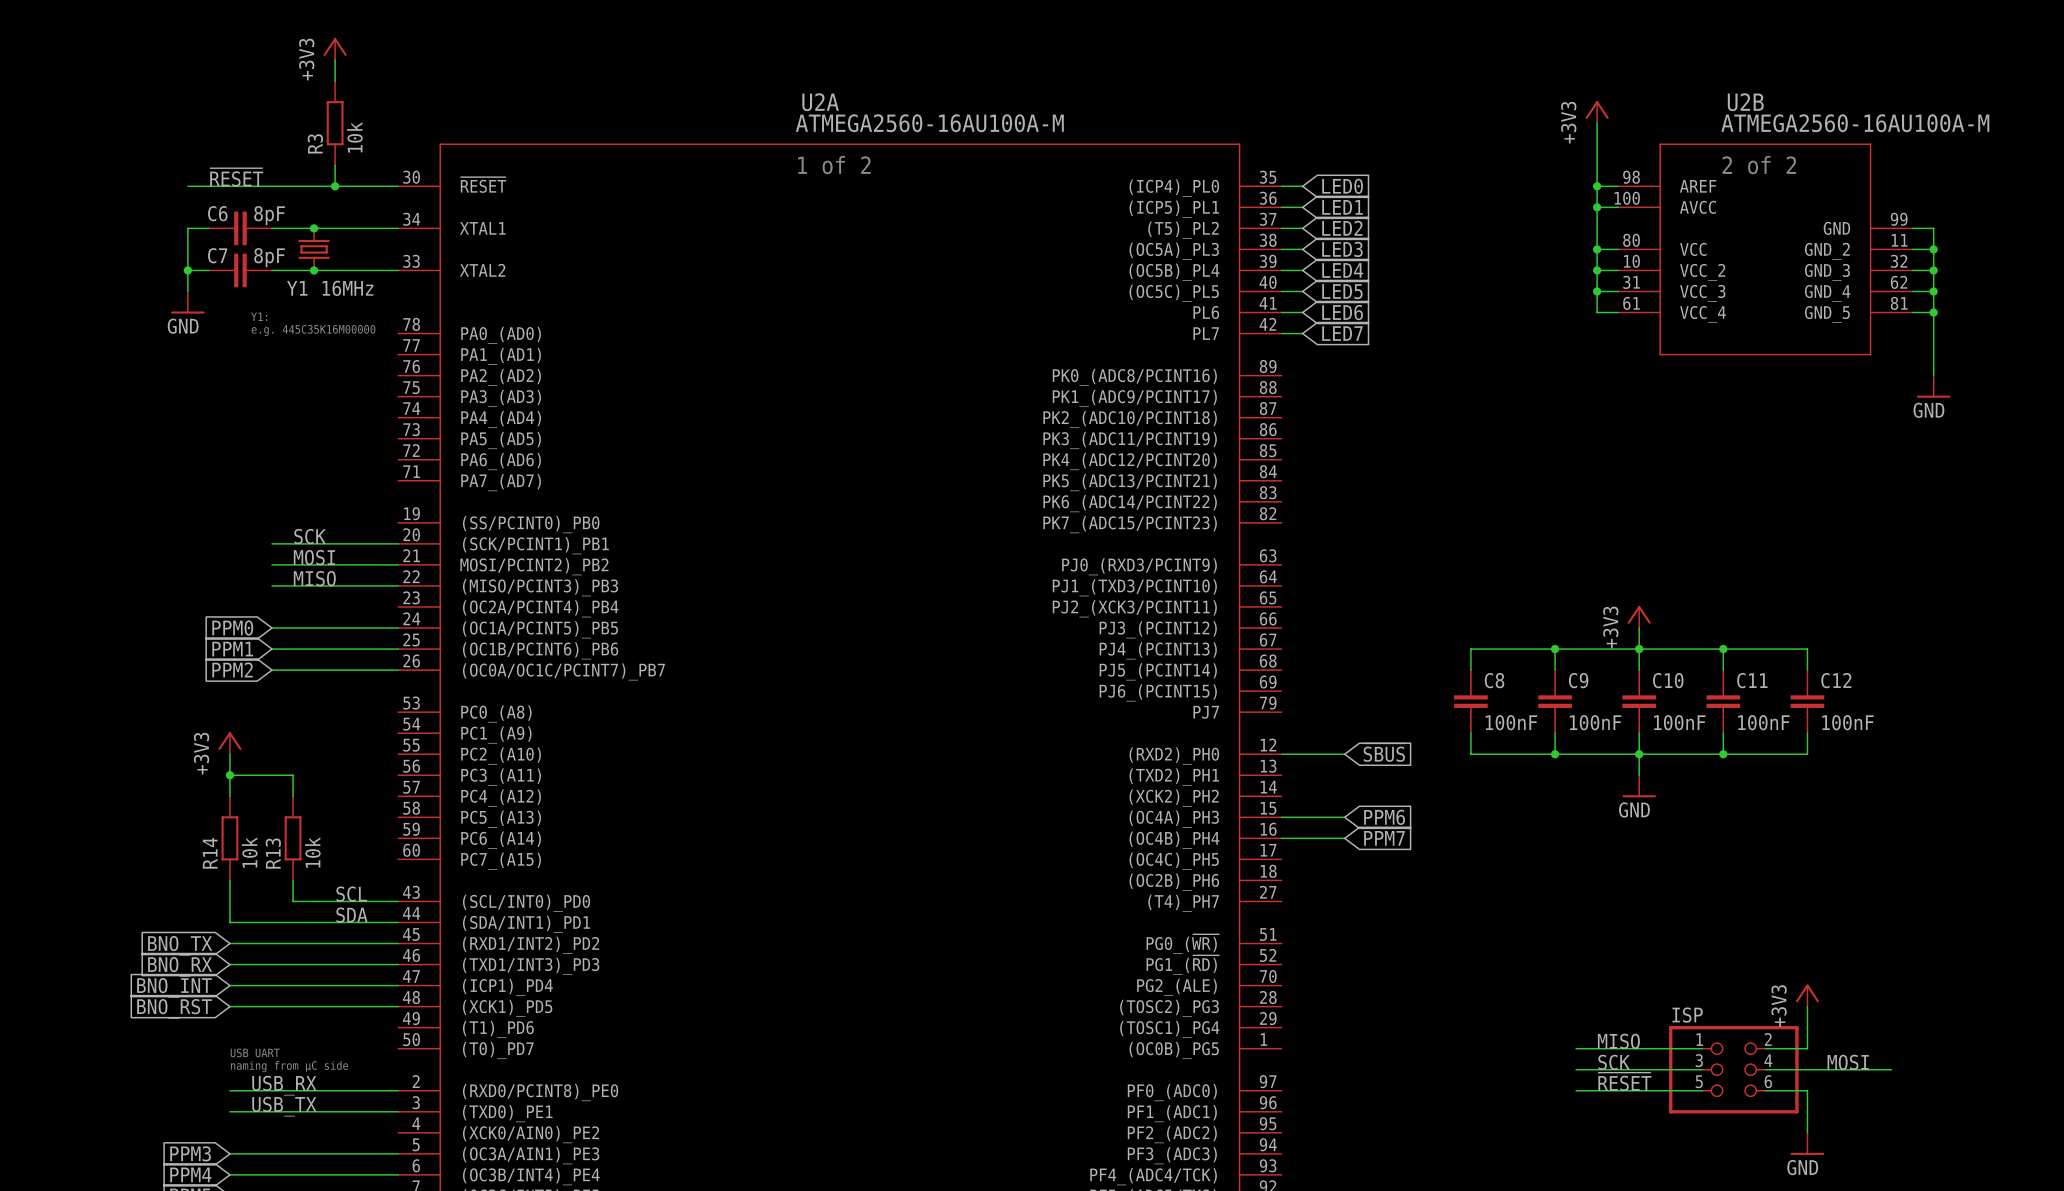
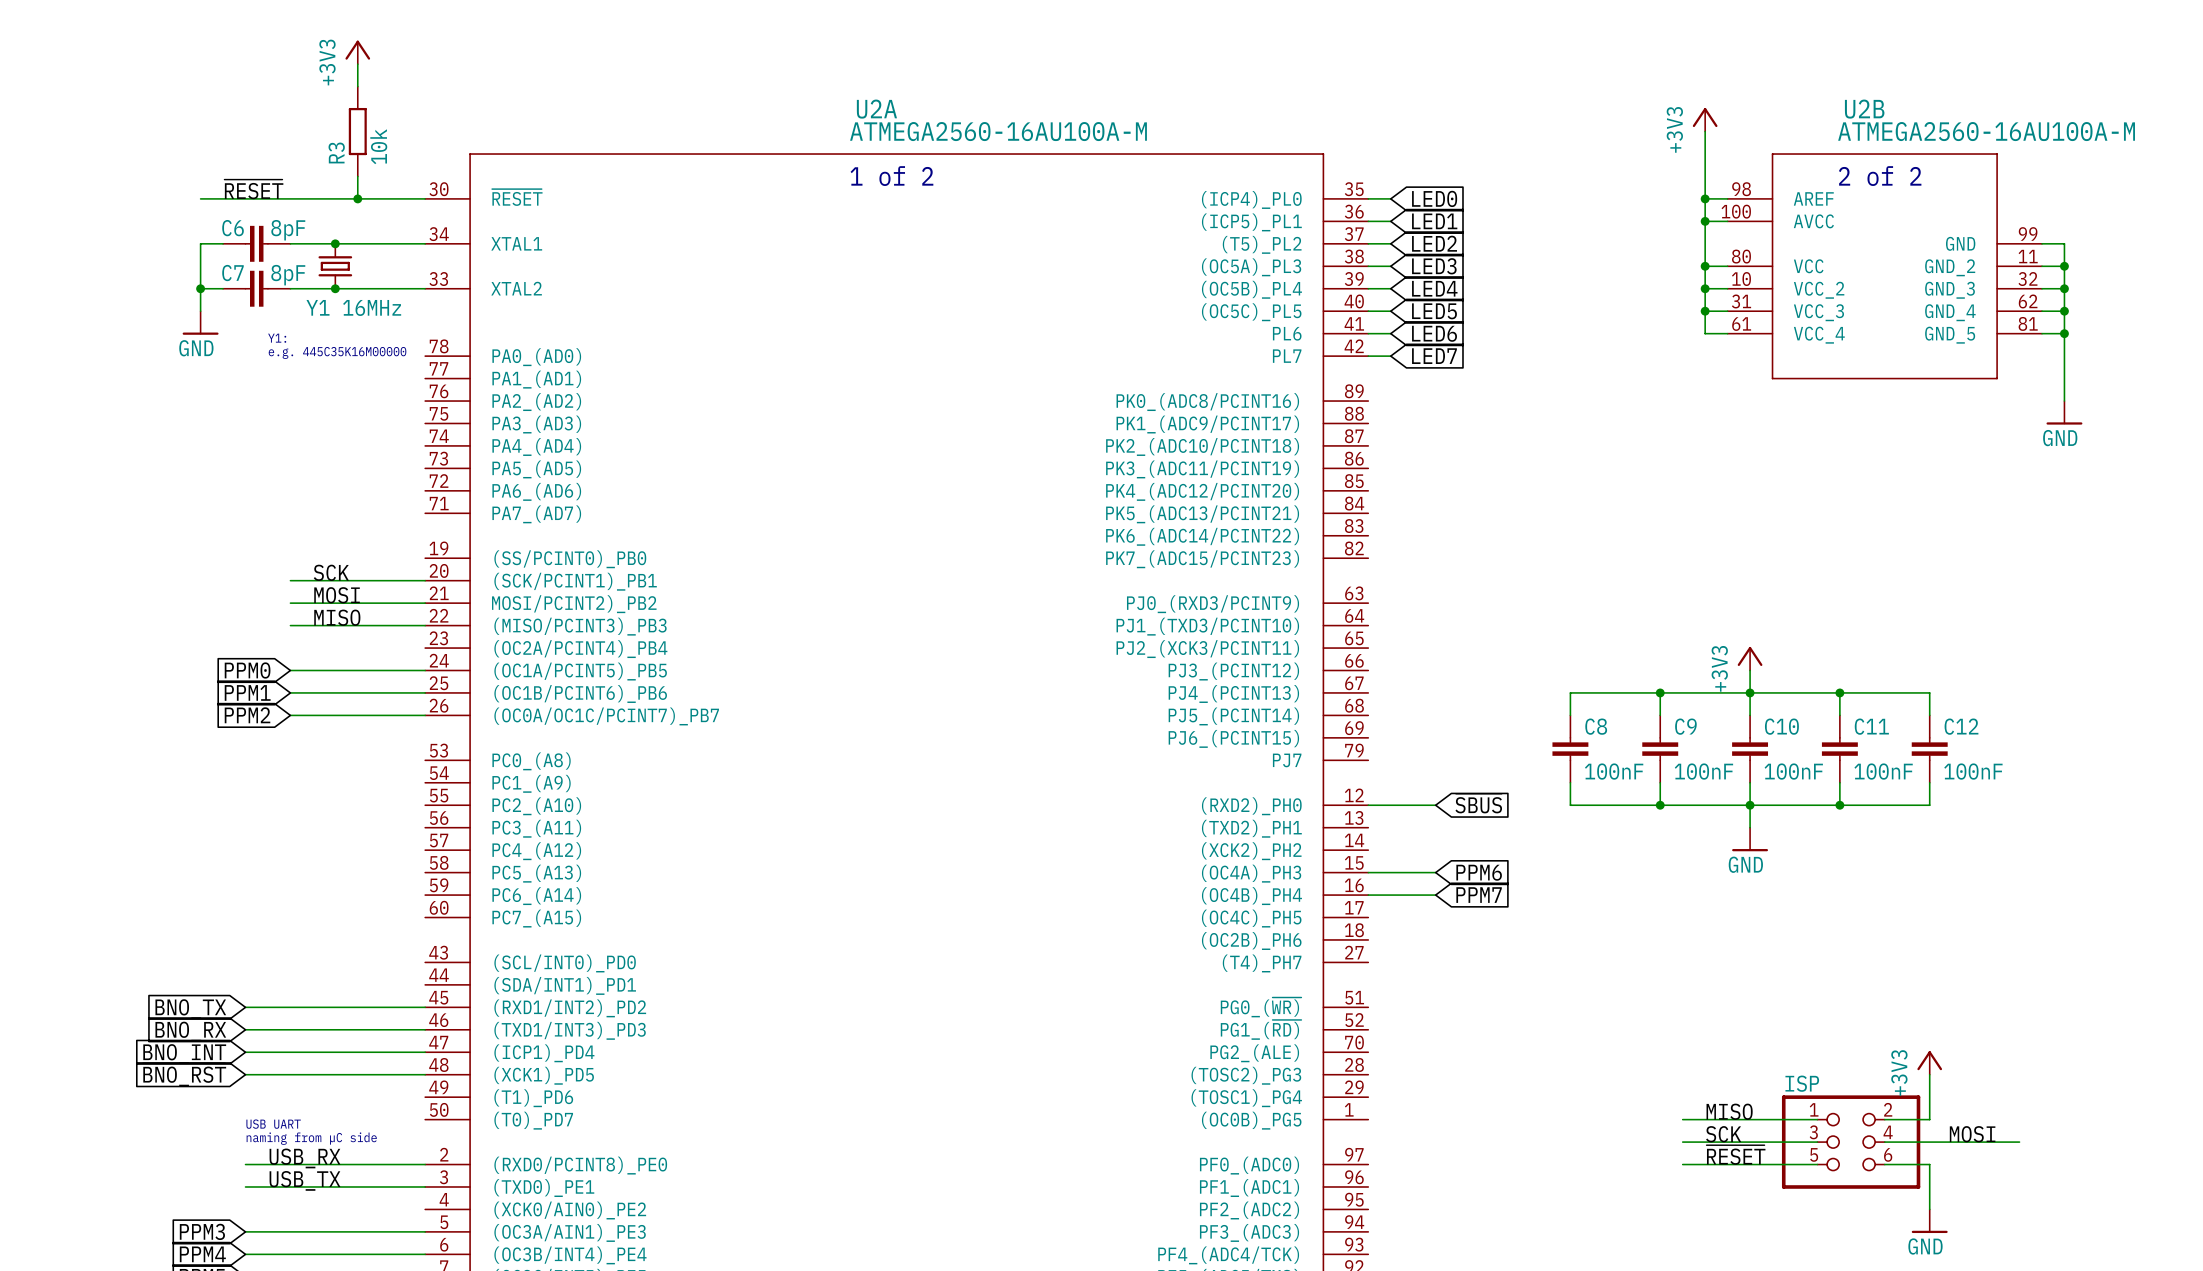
power symbol: +3V3 (229, 743) -> none
wire: (229, 754) (229, 796) -> none
wire: (229, 775) (293, 775) (293, 796) -> none
junction: (229, 775) -> none
R14: 10k (229, 838) -> none
R13: 10k (293, 838) -> none
wire: (229, 880) (229, 922) (398, 922) -> none
wire: (293, 880) (293, 901) (398, 901) -> none
label: SCL (351, 894) -> none
label: SDA (351, 915) -> none

